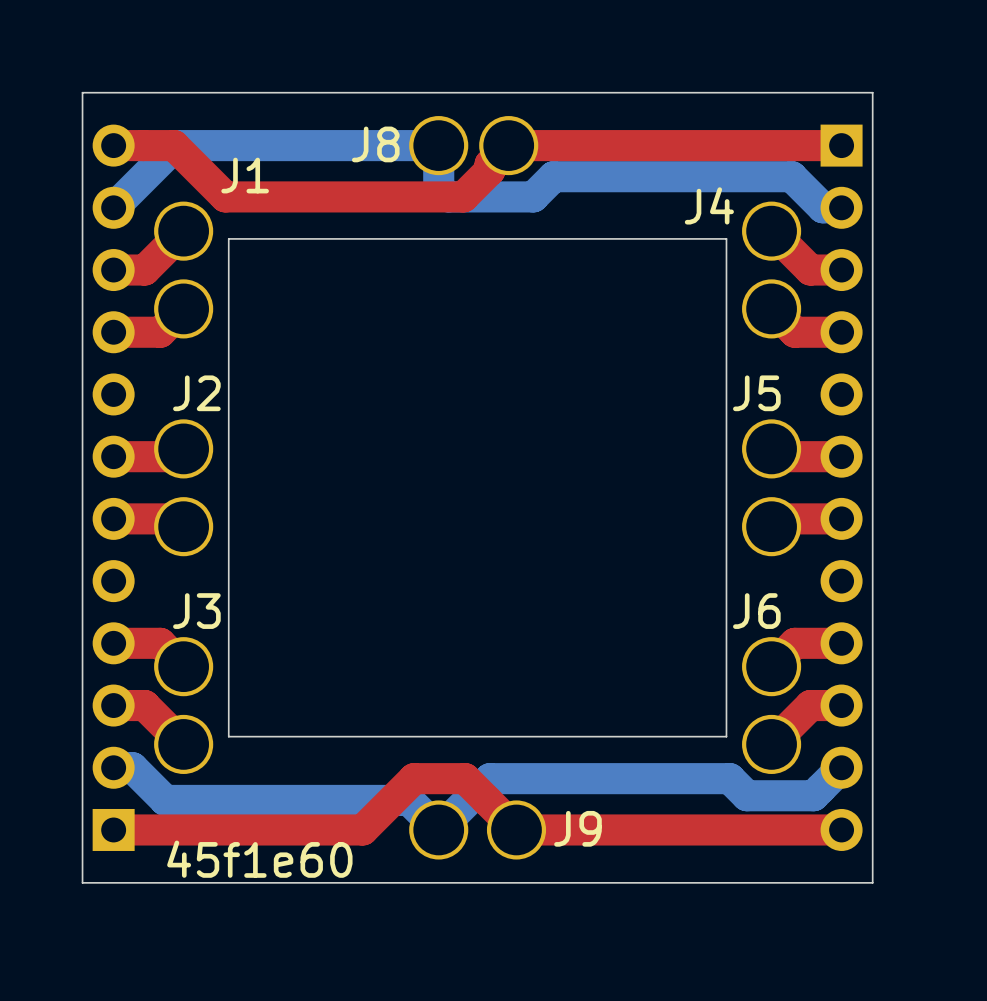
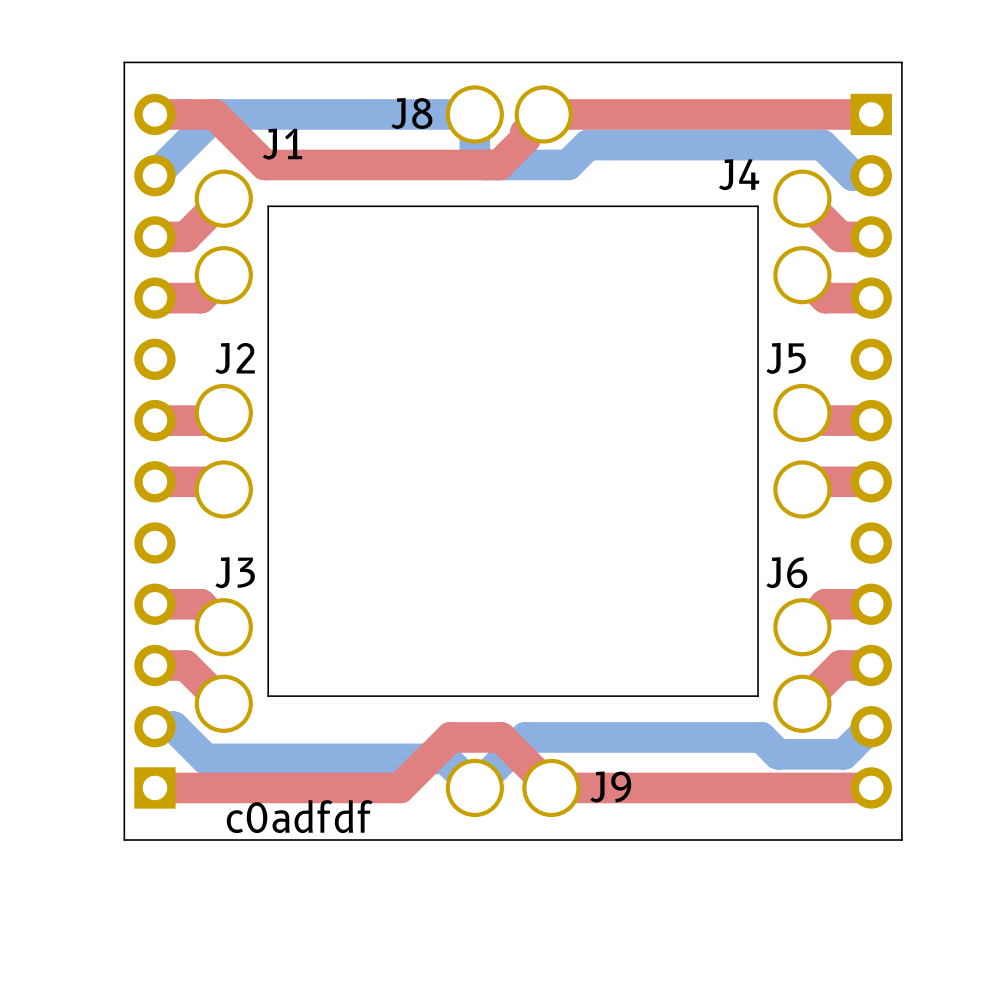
text: 45f1e60 (259, 859) -> c0adfdf (299, 816)

